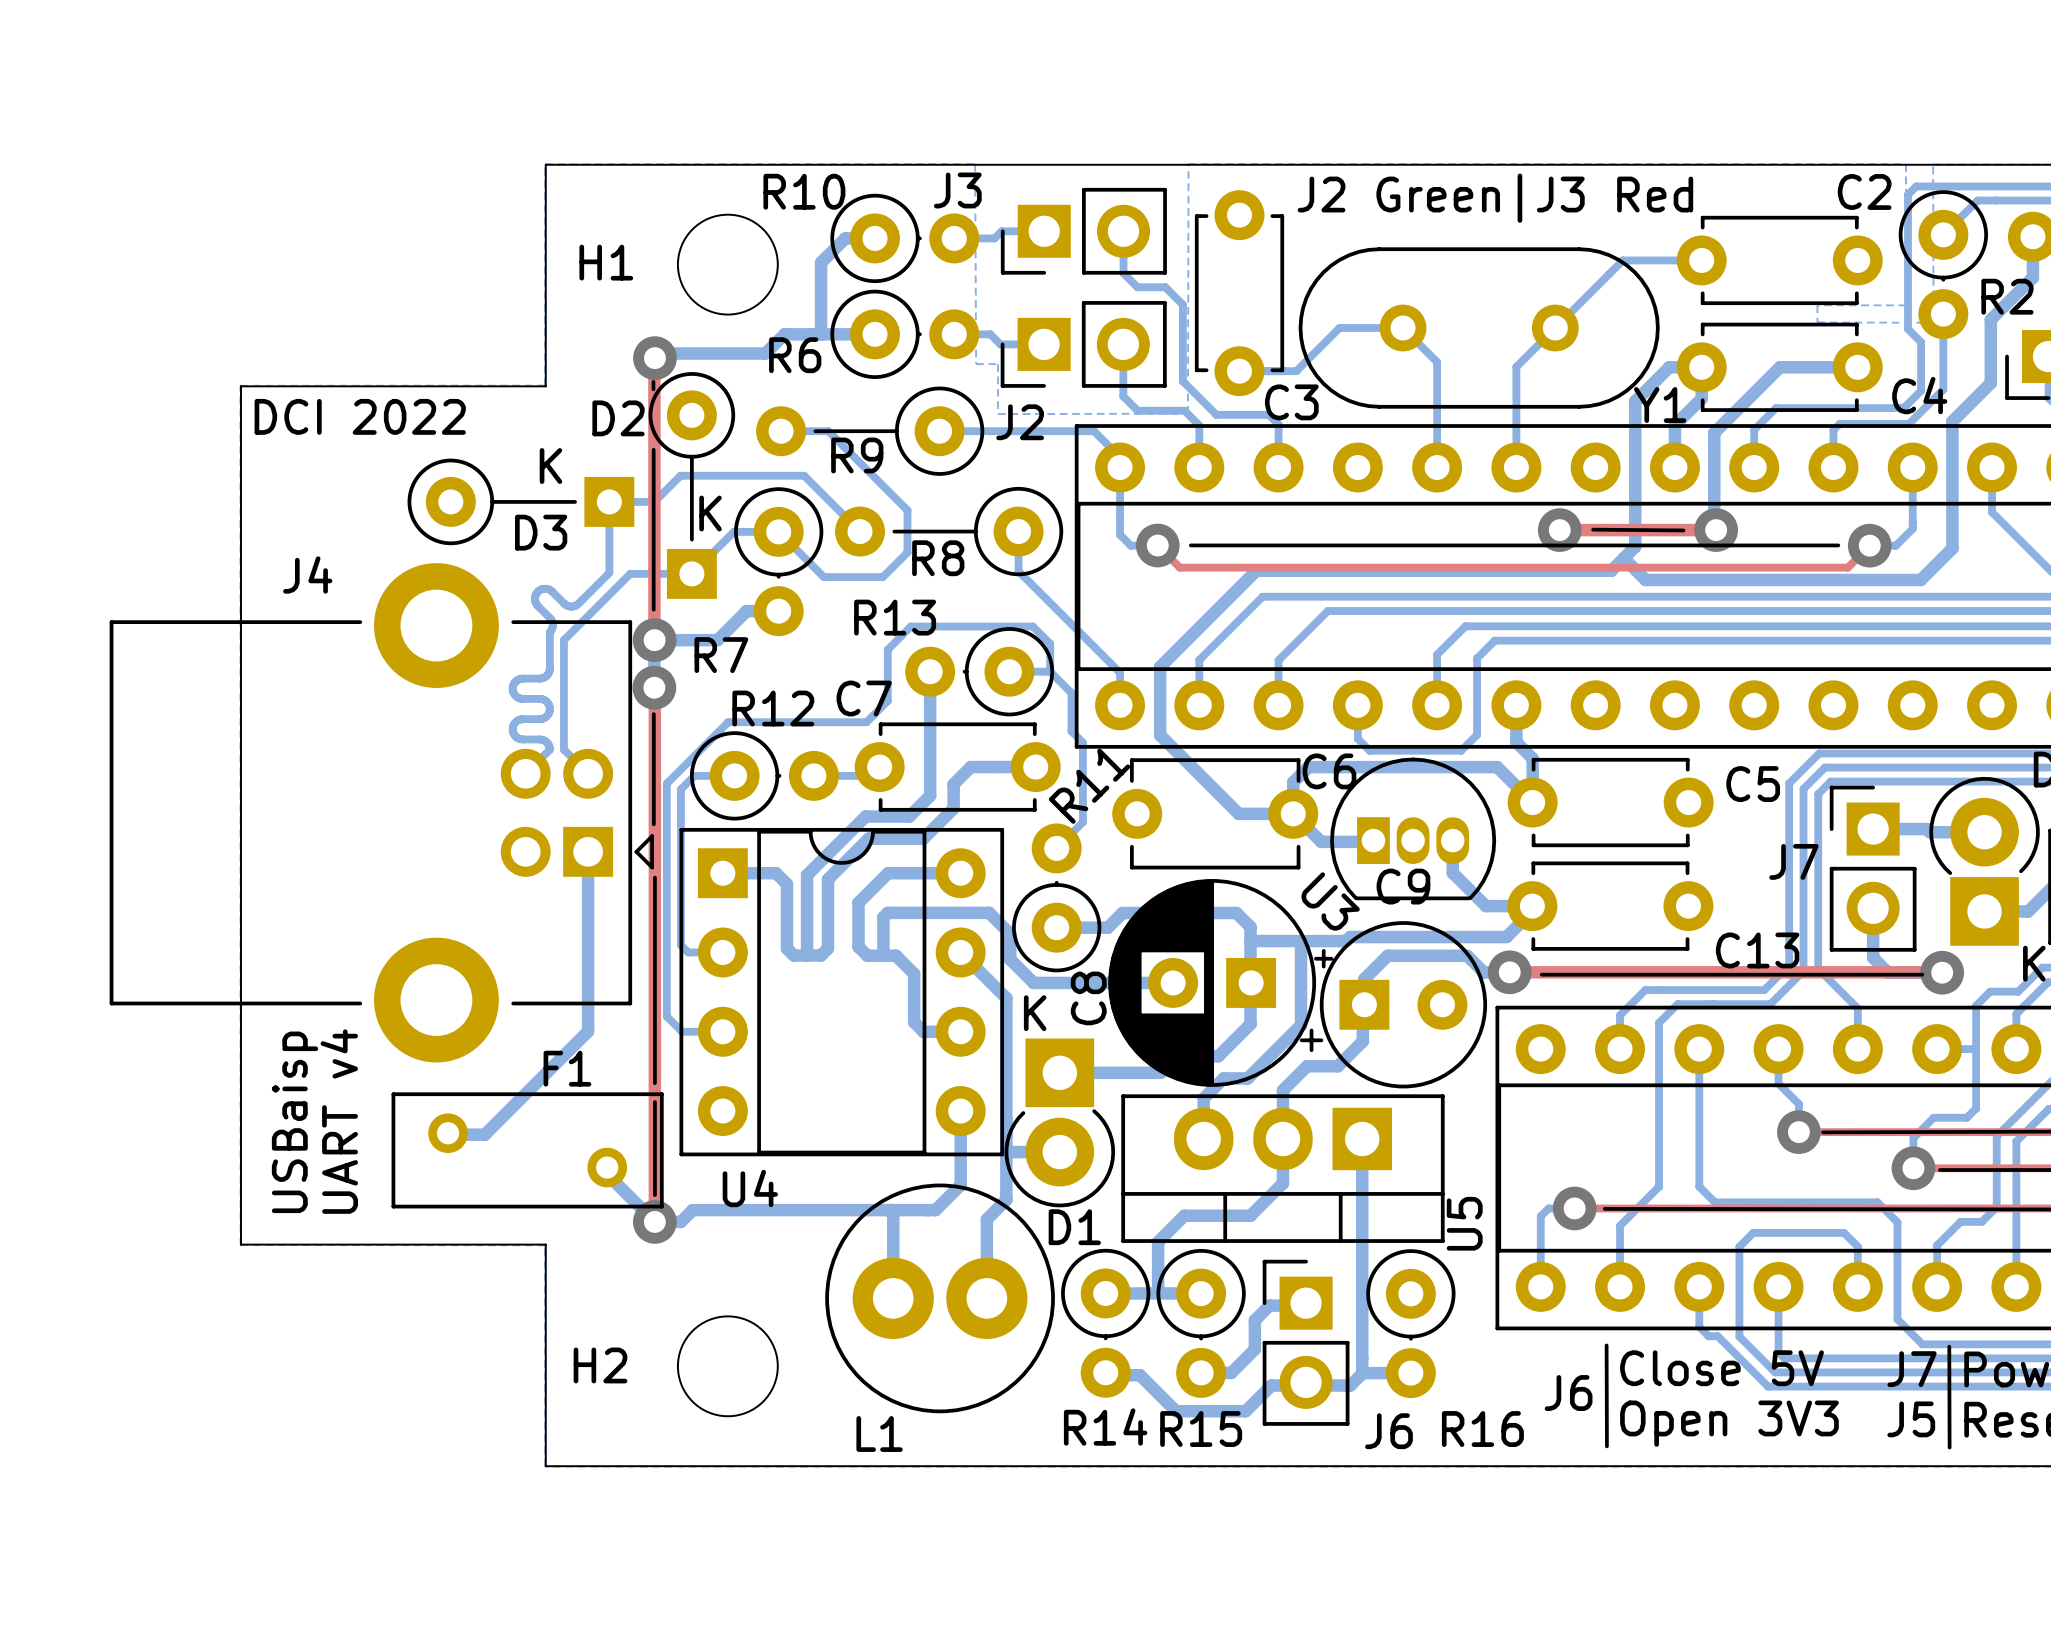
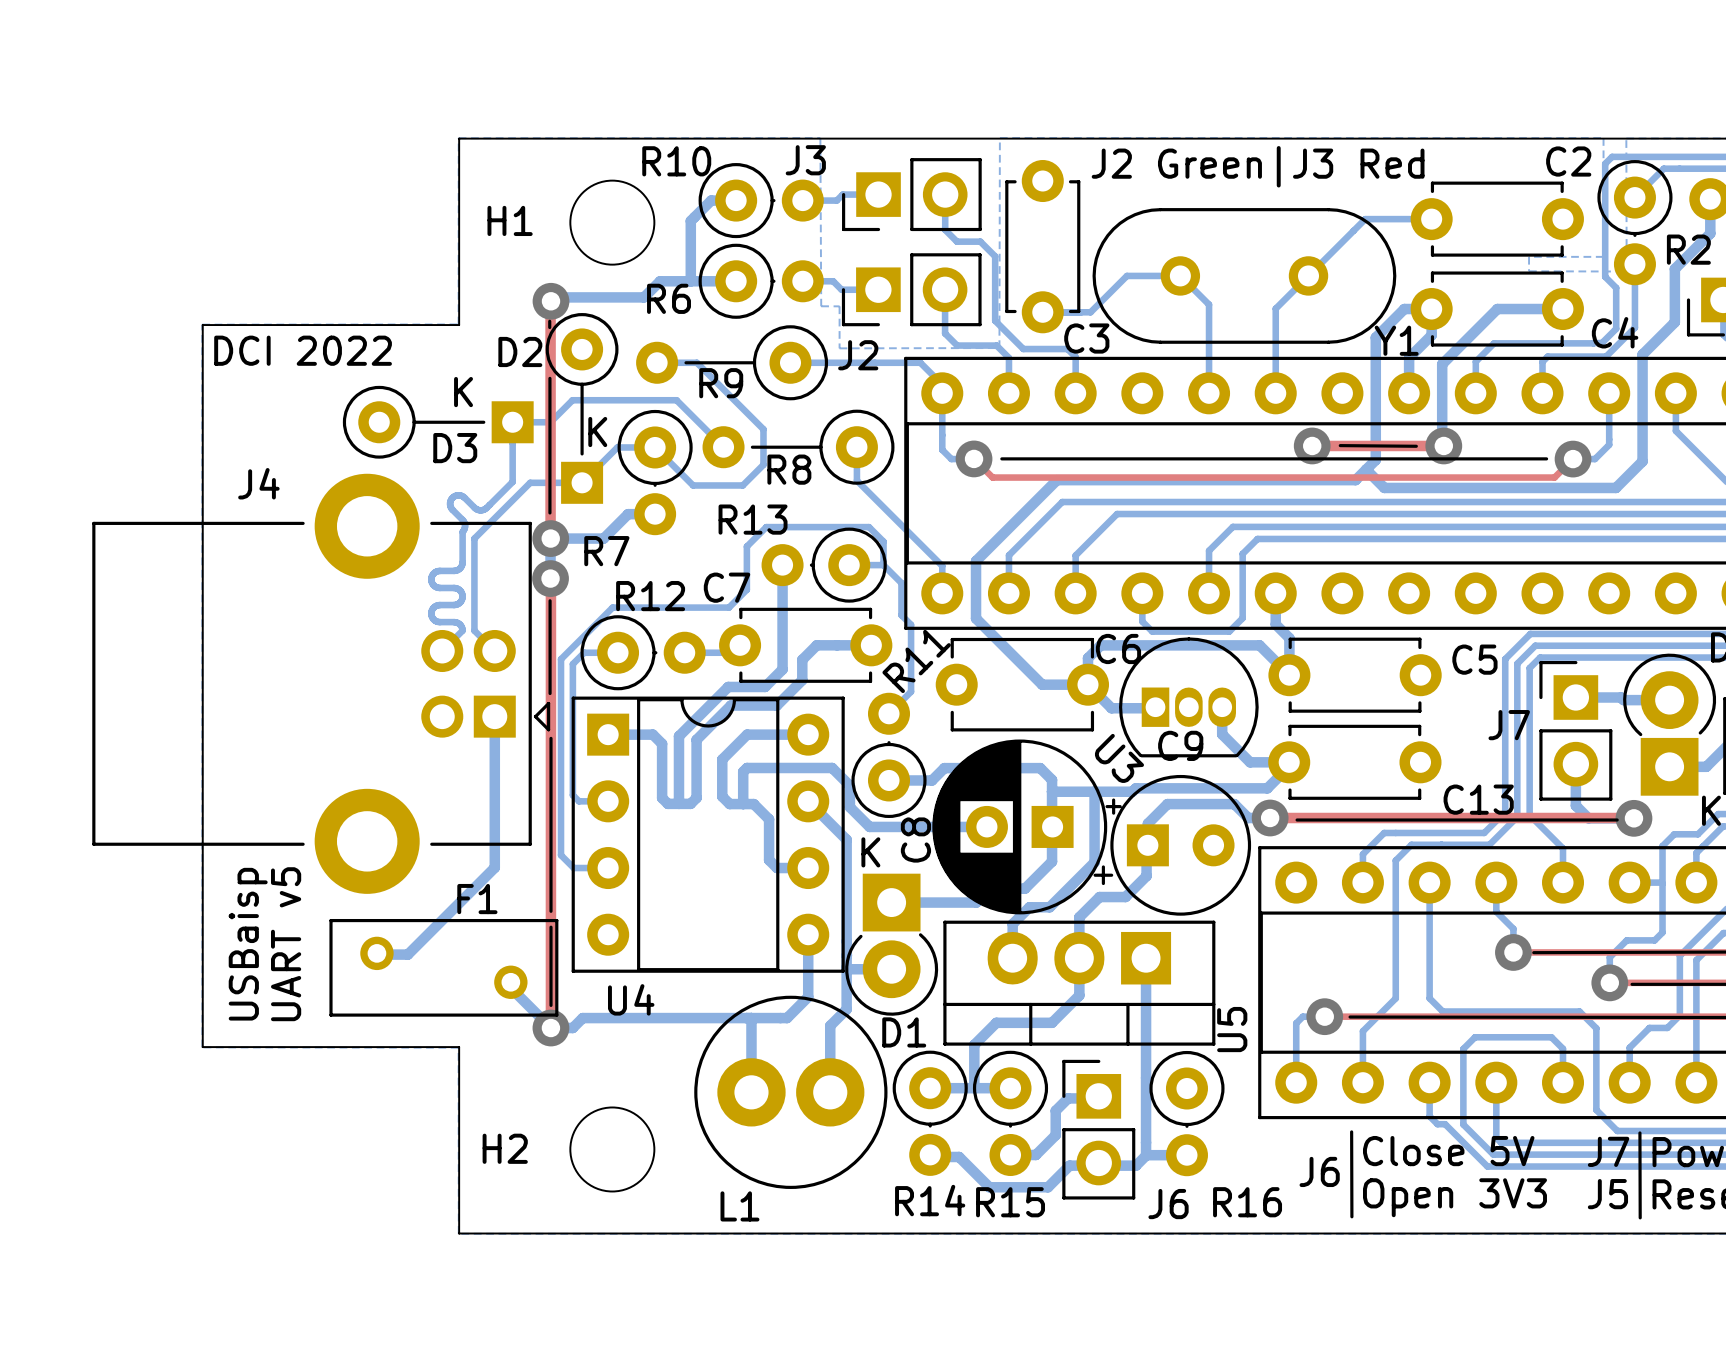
text: UART v4 (339, 1121) -> UART v5 (286, 944)

